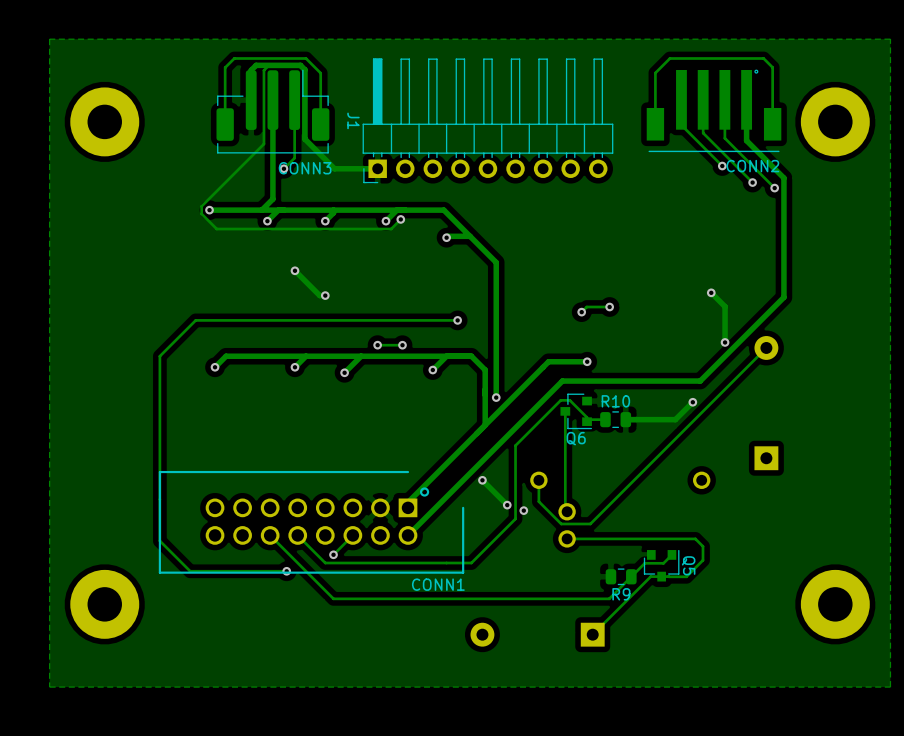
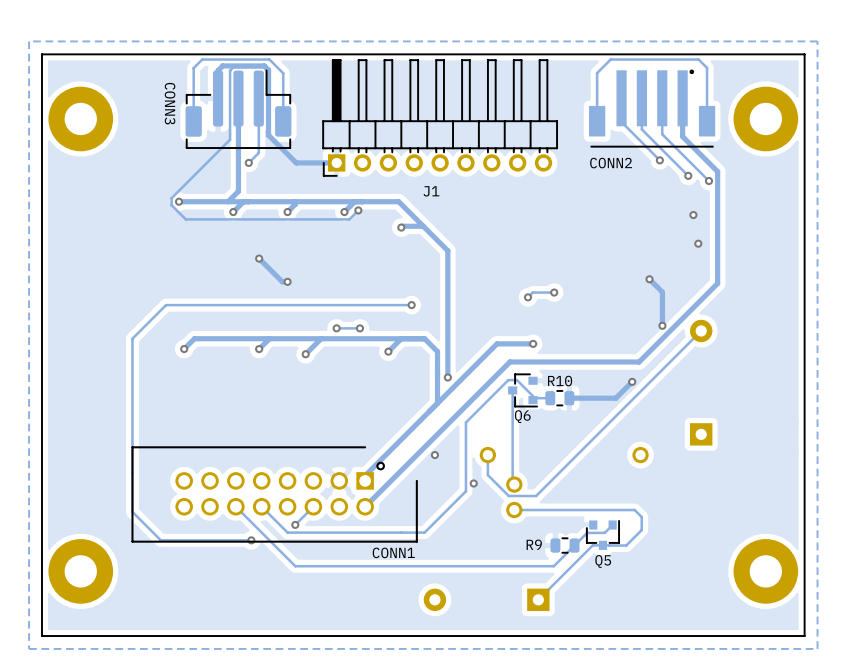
board edge: none -> (804, 54) (804, 636) (41, 636) (41, 54) (804, 54)
J1 name rotation: 0° (353, 120) -> 90° counterclockwise (431, 191)
J1 name position: J1 (353, 120) -> J1 (431, 191)
CONN2 name position: CONN2 (752, 166) -> CONN2 (611, 163)
CONN3 name rotation: 0° (305, 168) -> 90° clockwise (170, 103)
CONN3 name position: CONN3 (305, 168) -> CONN3 (170, 103)
via: none -> (693, 215)
via: none -> (698, 243)
track: (482, 480) (507, 505) -> none
via: (507, 505) -> none
Q5 name rotation: 0° (688, 565) -> 90° counterclockwise (603, 561)
Q5 name position: Q5 (688, 565) -> Q5 (603, 561)
R9 name position: R9 (621, 594) -> R9 (534, 544)

